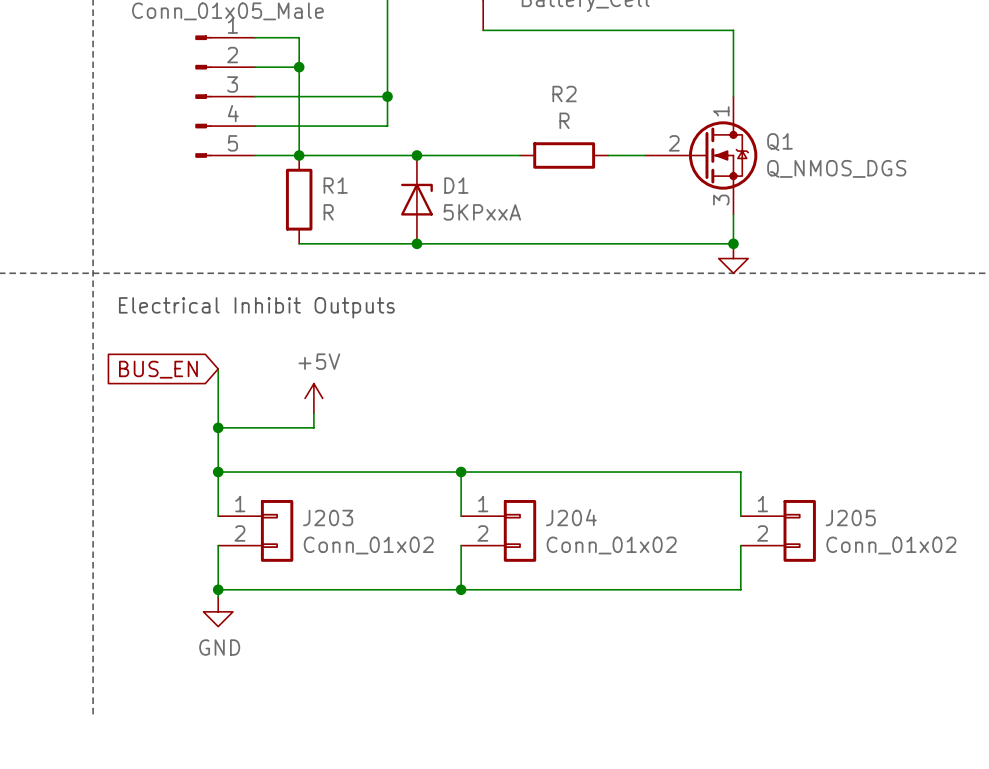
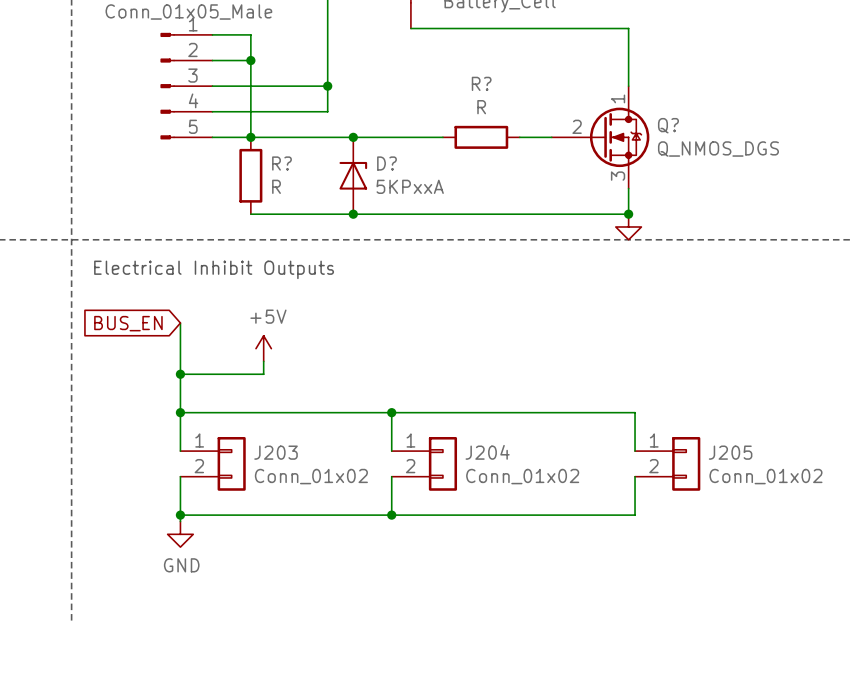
R2 name: R2 (564, 94) -> R? (481, 83)
Q1 name: Q1 (779, 142) -> Q? (668, 125)
R1 name: R1 (335, 185) -> R? (282, 163)
D1 name: D1 (456, 185) -> D? (387, 163)

